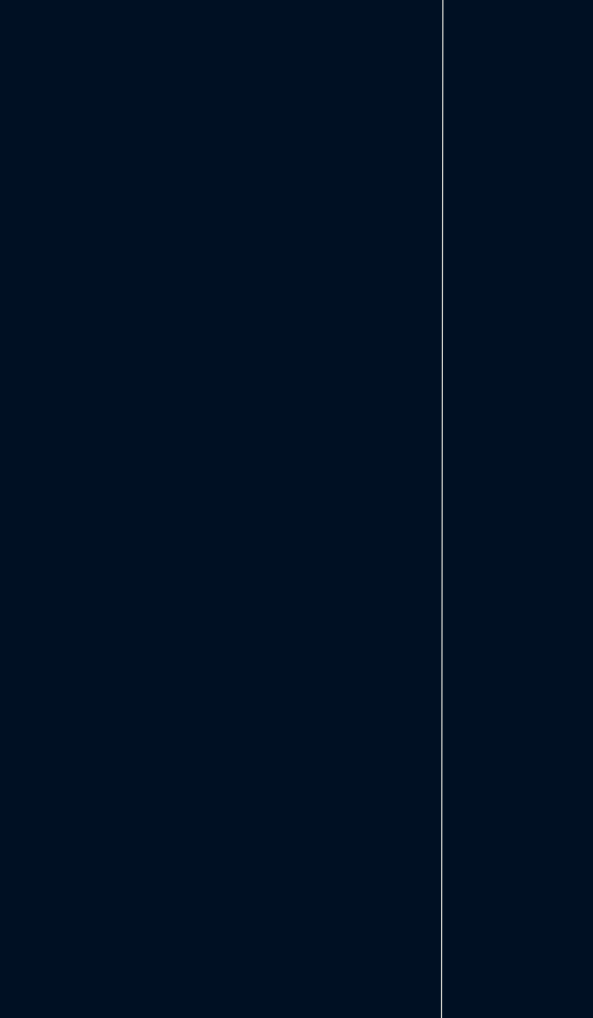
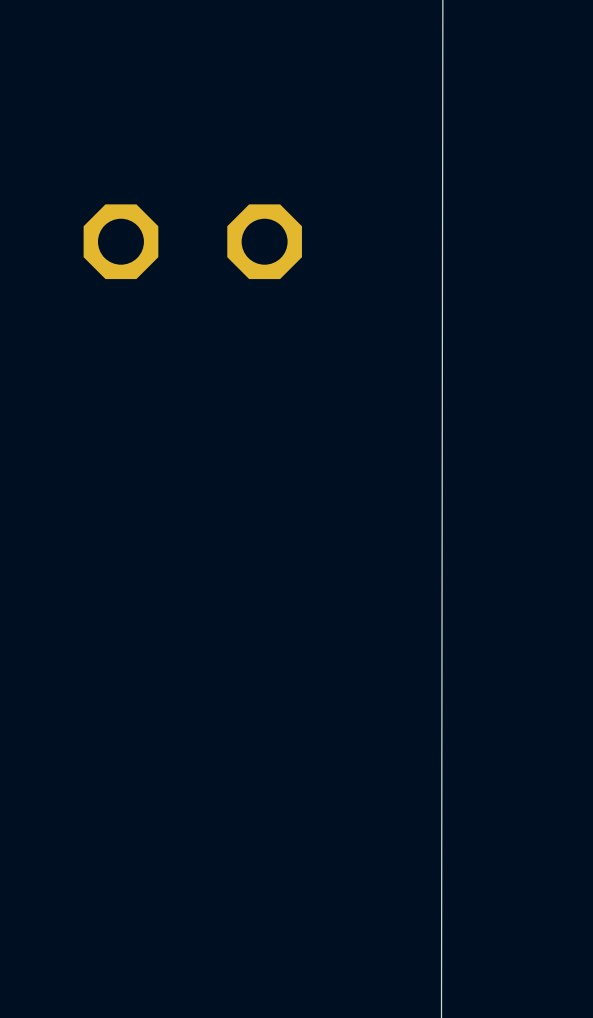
part: none -> (192, 241)

